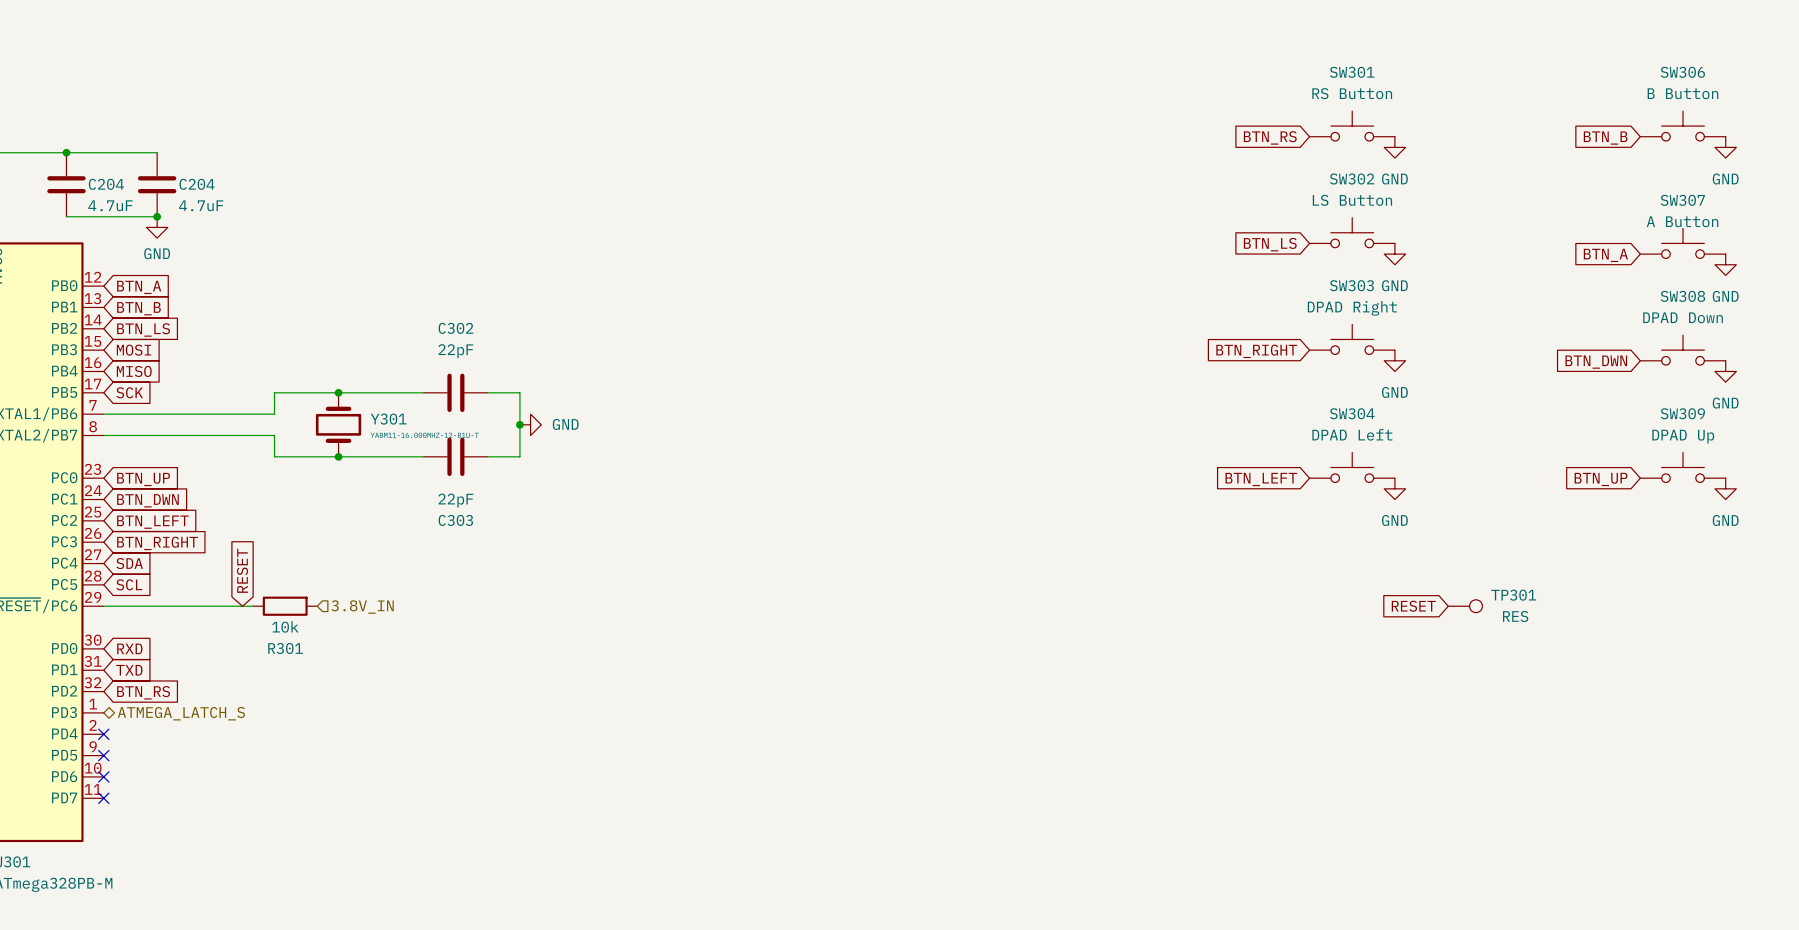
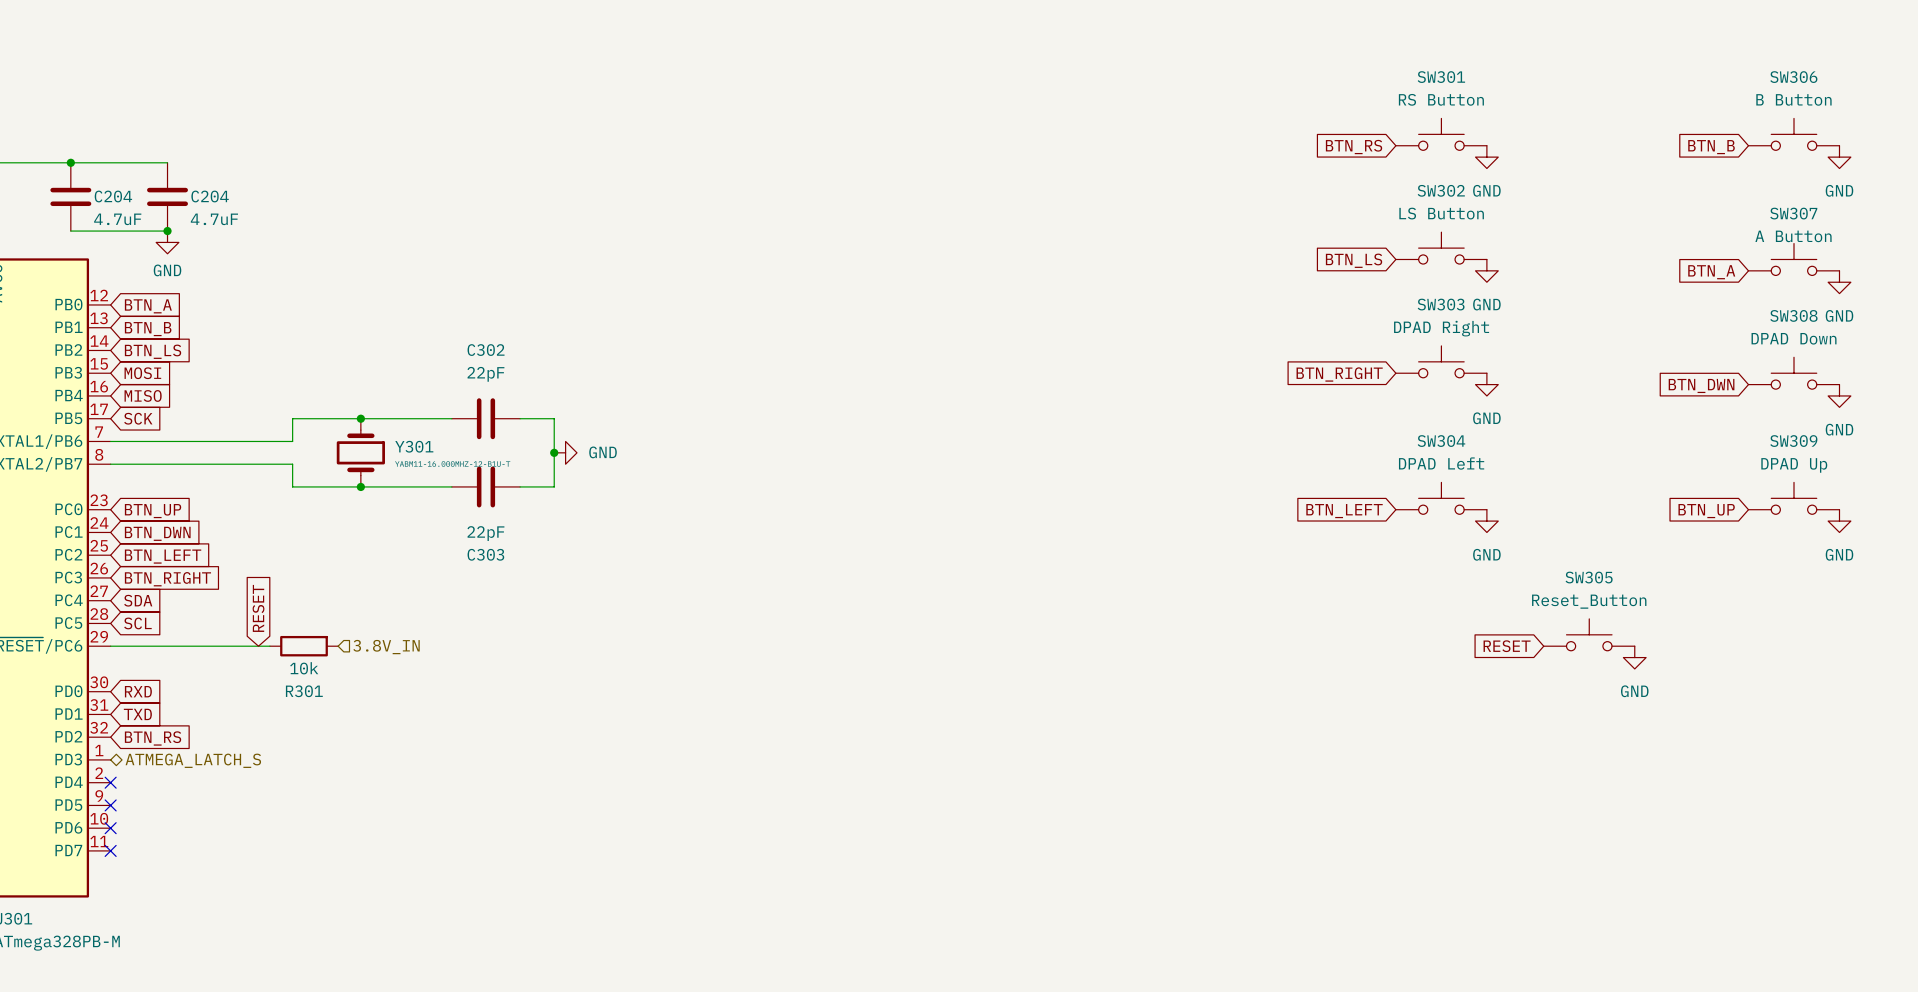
SW305: none -> Reset_Button (1589, 634)
TP301: RES (1465, 606) -> none
power symbol: none -> GND (1634, 657)

